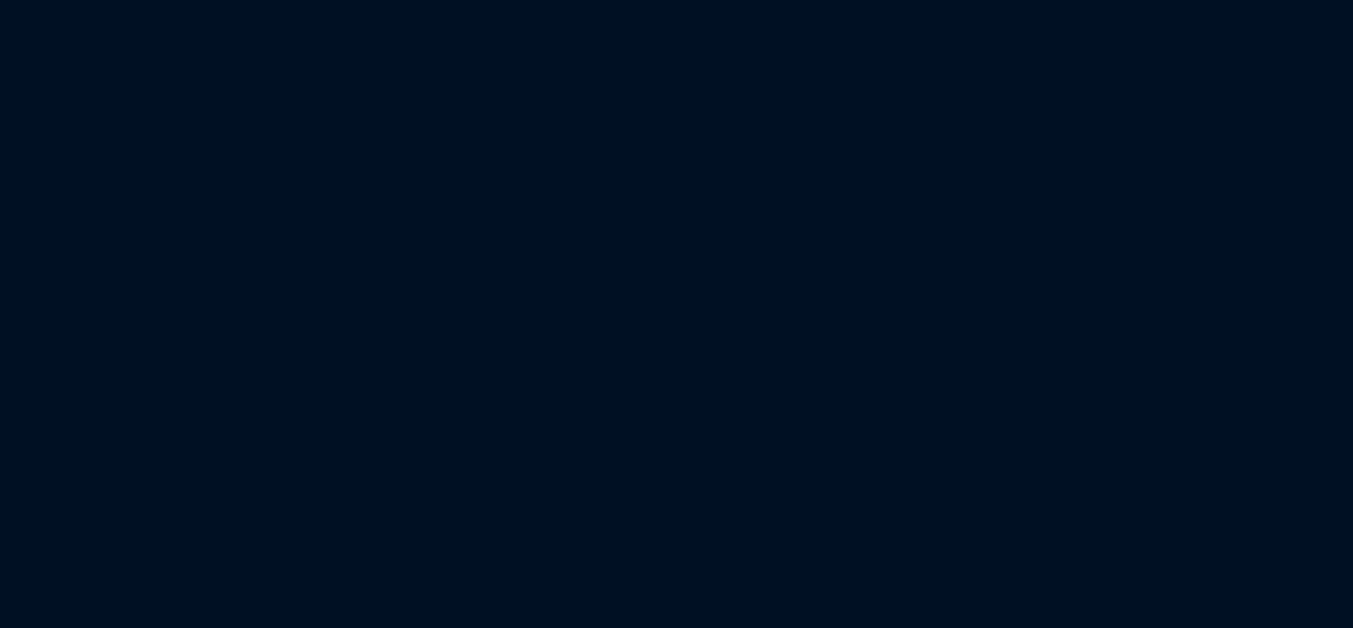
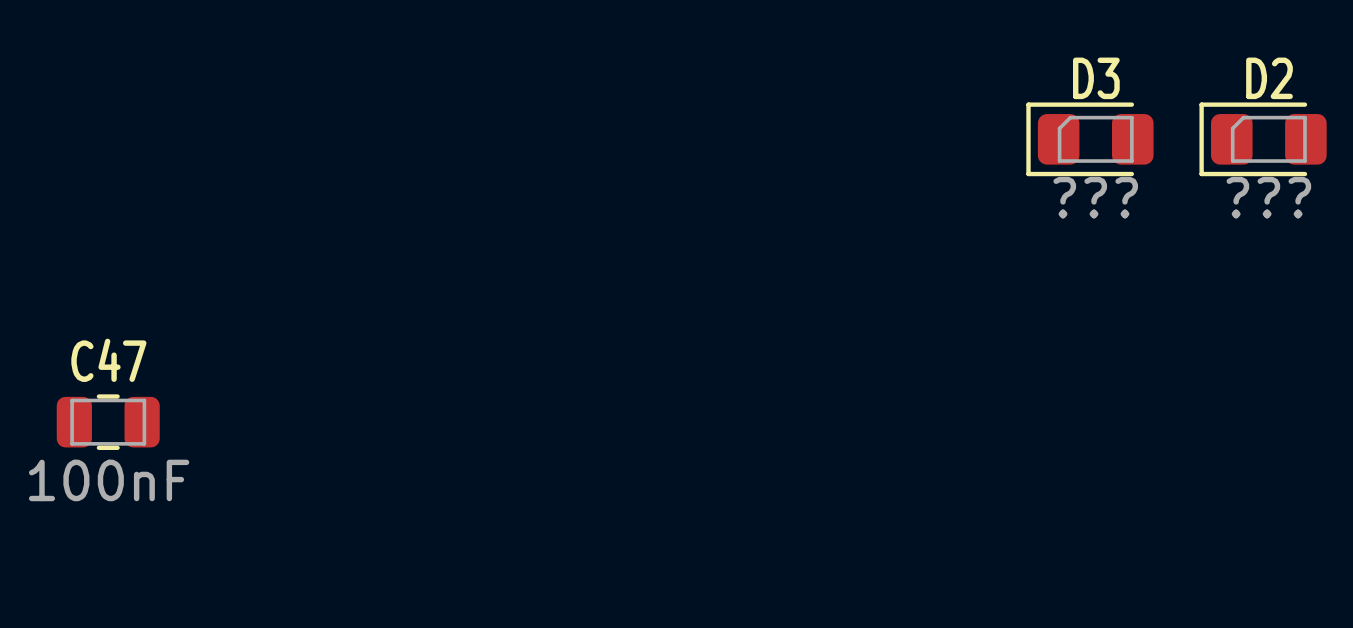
D3: none -> ??? (1089, 139)
D2: none -> ??? (1263, 139)
C47: none -> 100nF (108, 422)

